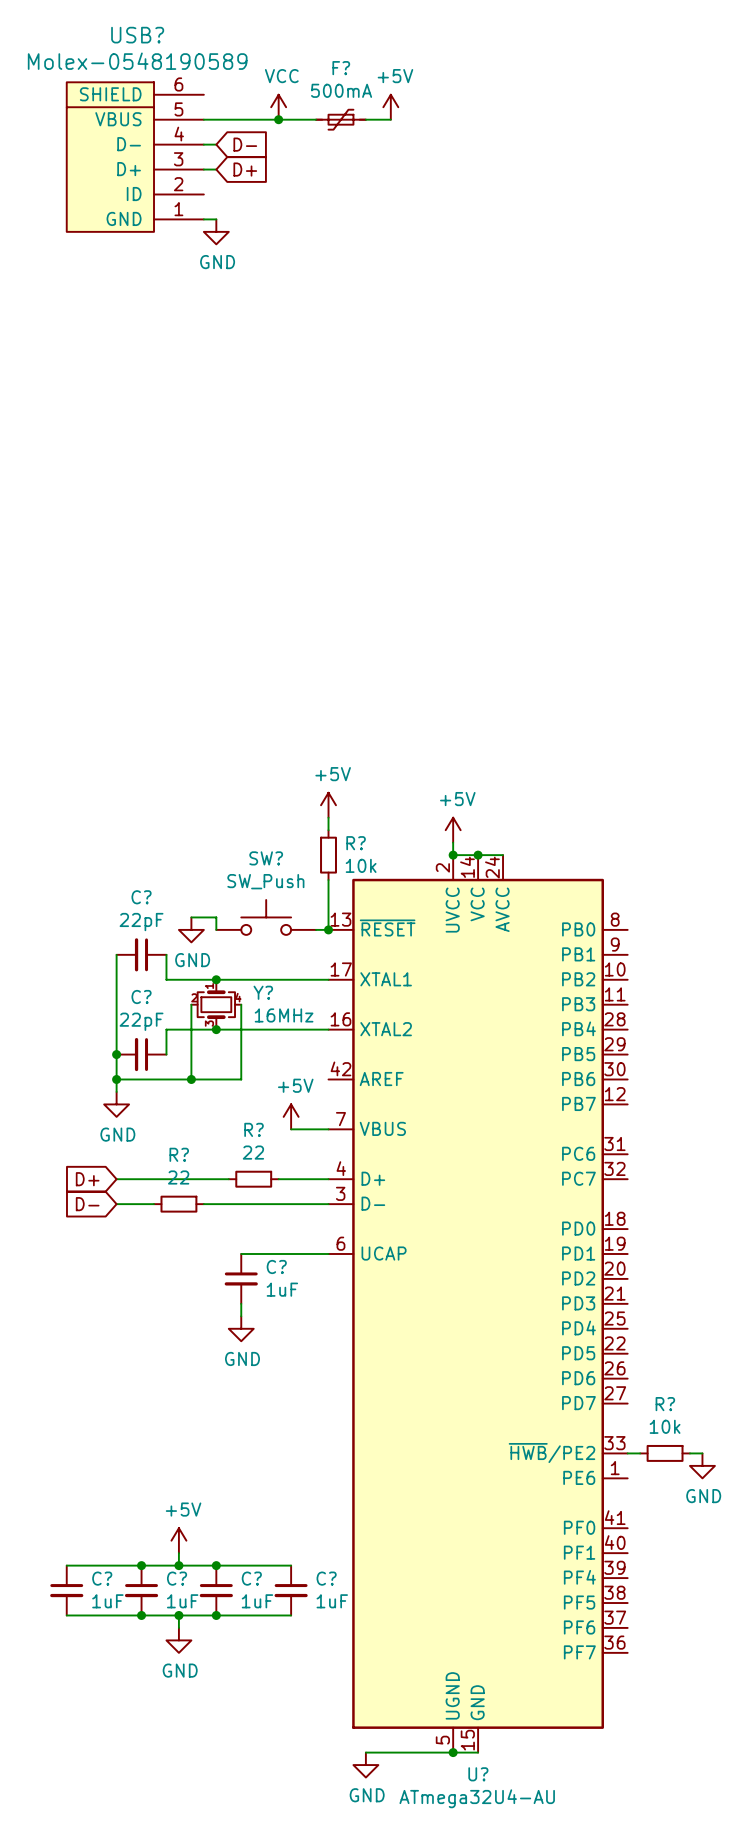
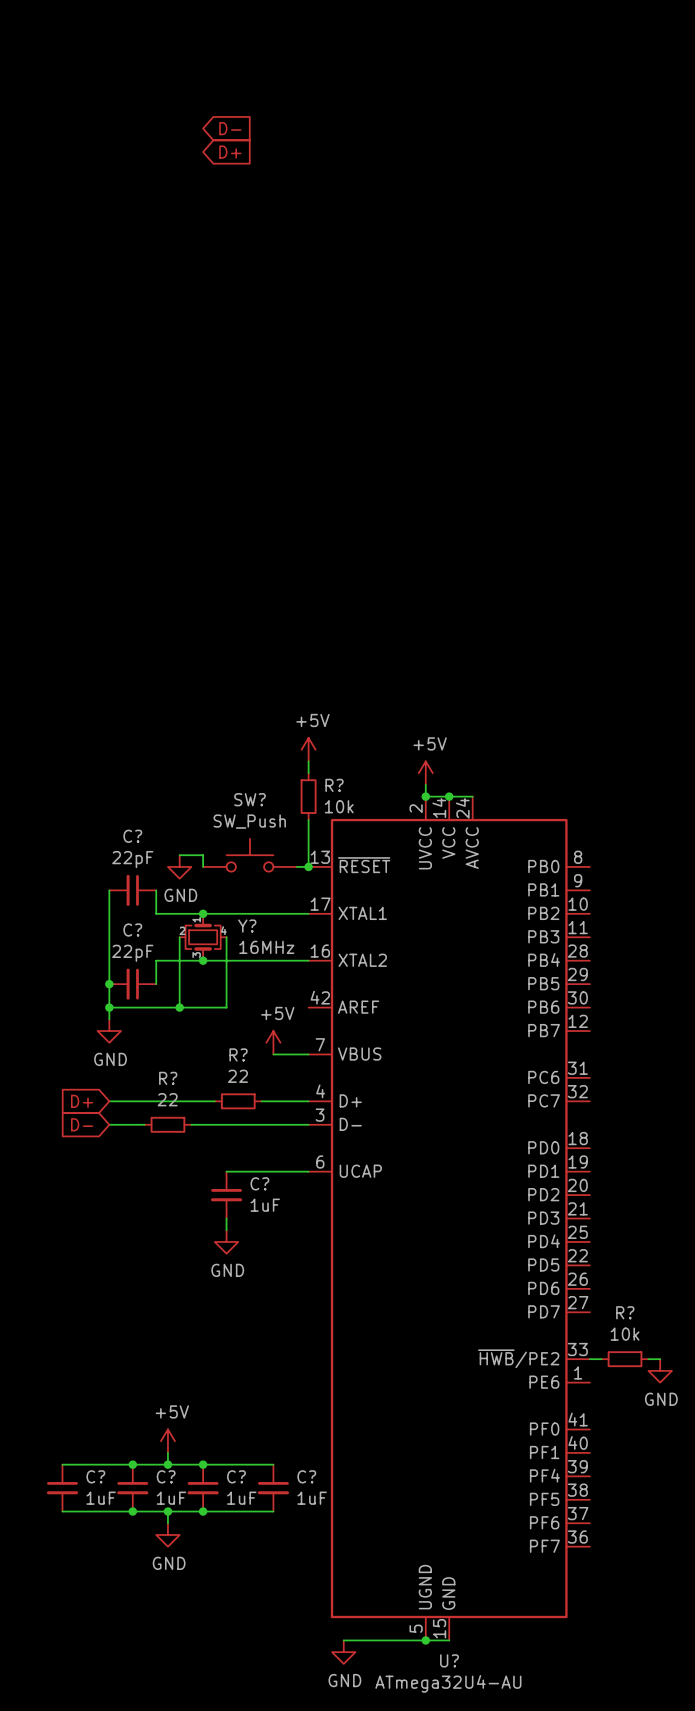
power symbol: VCC (278, 107) -> none
power symbol: +5V (390, 107) -> none
wire: (203, 119) (316, 119) -> none
junction: (278, 119) -> none
F?: 500mA (340, 119) -> none
wire: (365, 119) (390, 119) -> none
wire: (203, 144) (216, 144) -> none
USB?: Molex-0548190589 (135, 157) -> none
wire: (203, 169) (216, 169) -> none
wire: (203, 219) (216, 219) -> none
power symbol: GND (216, 231) -> none

